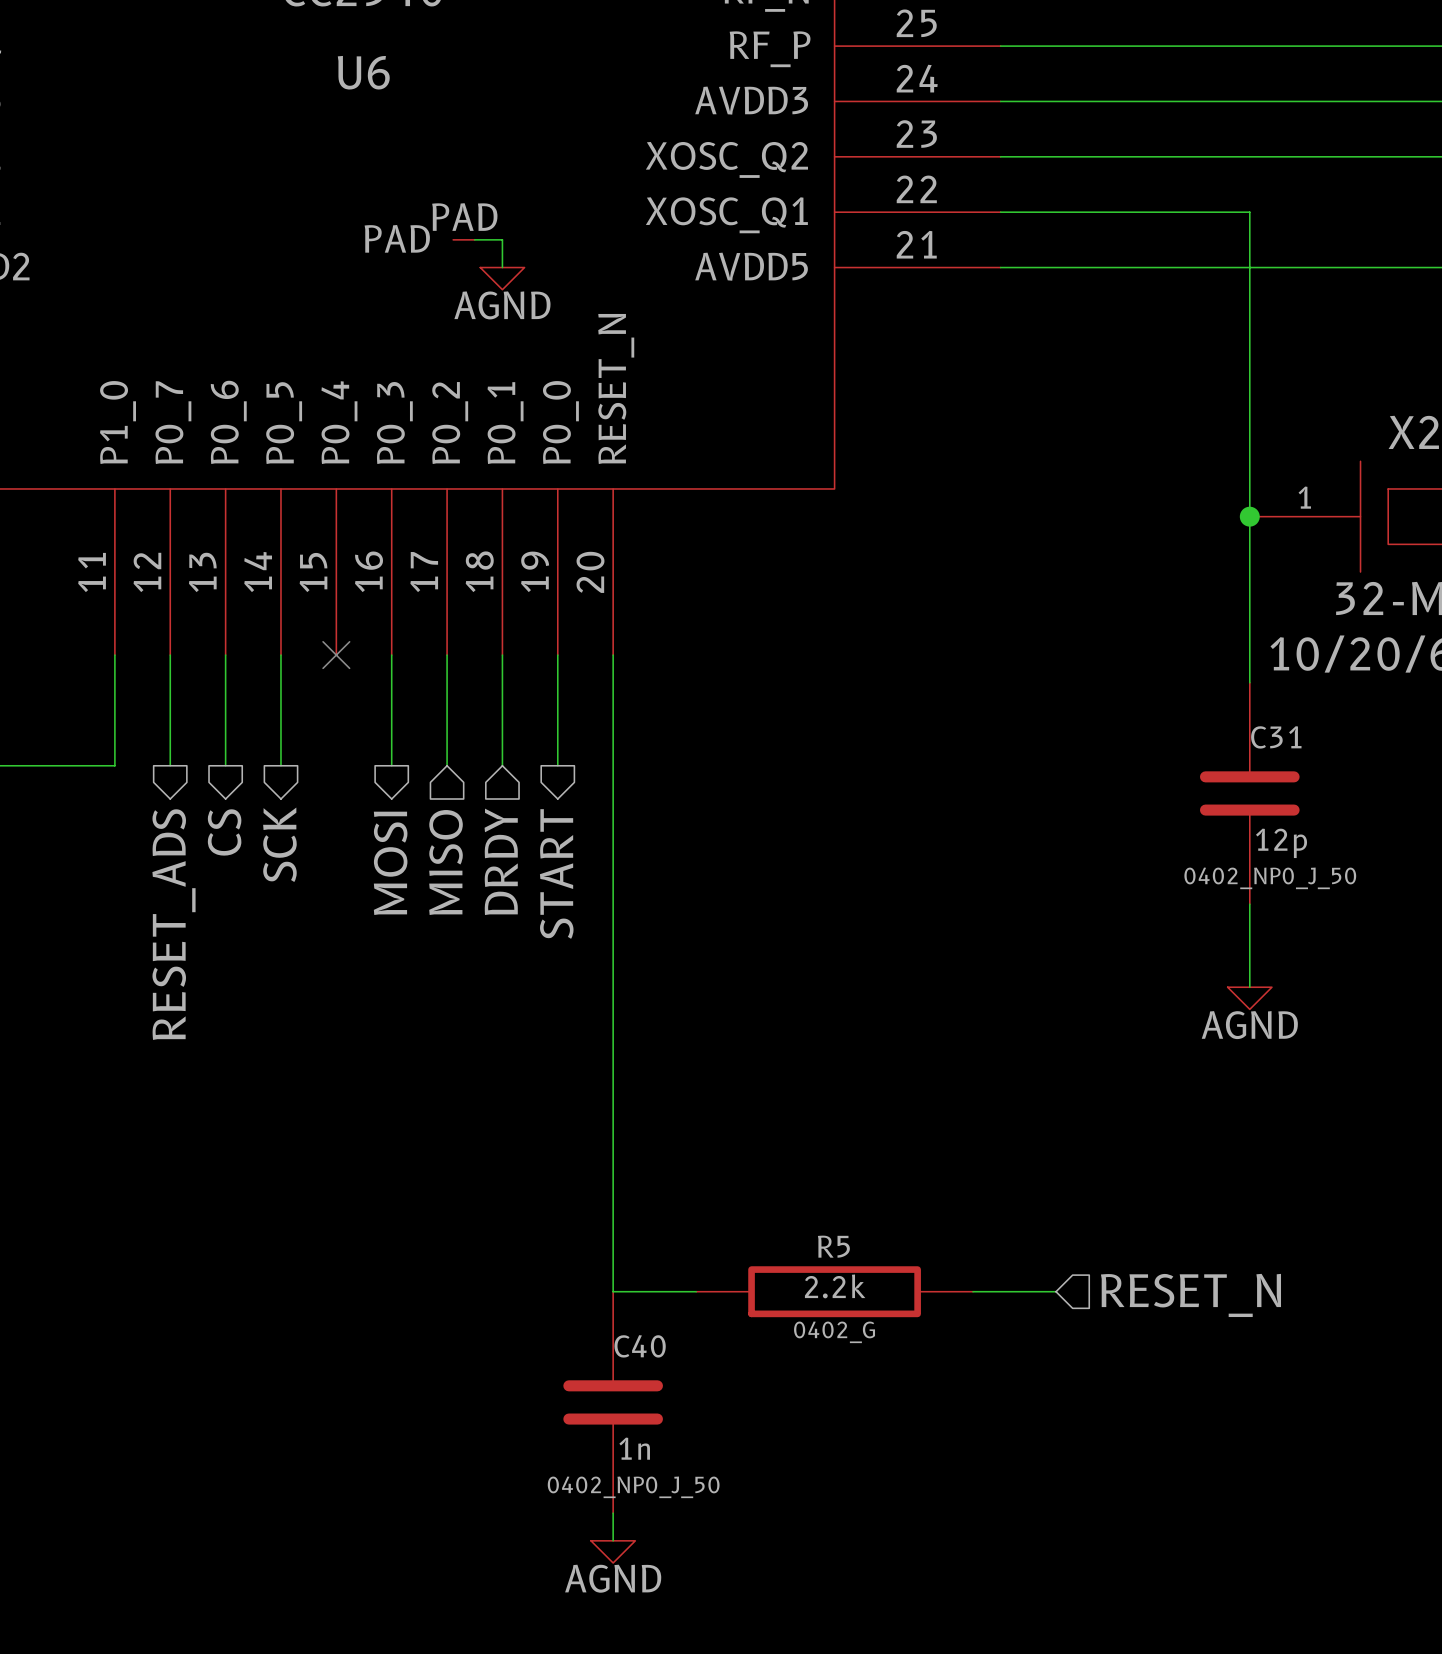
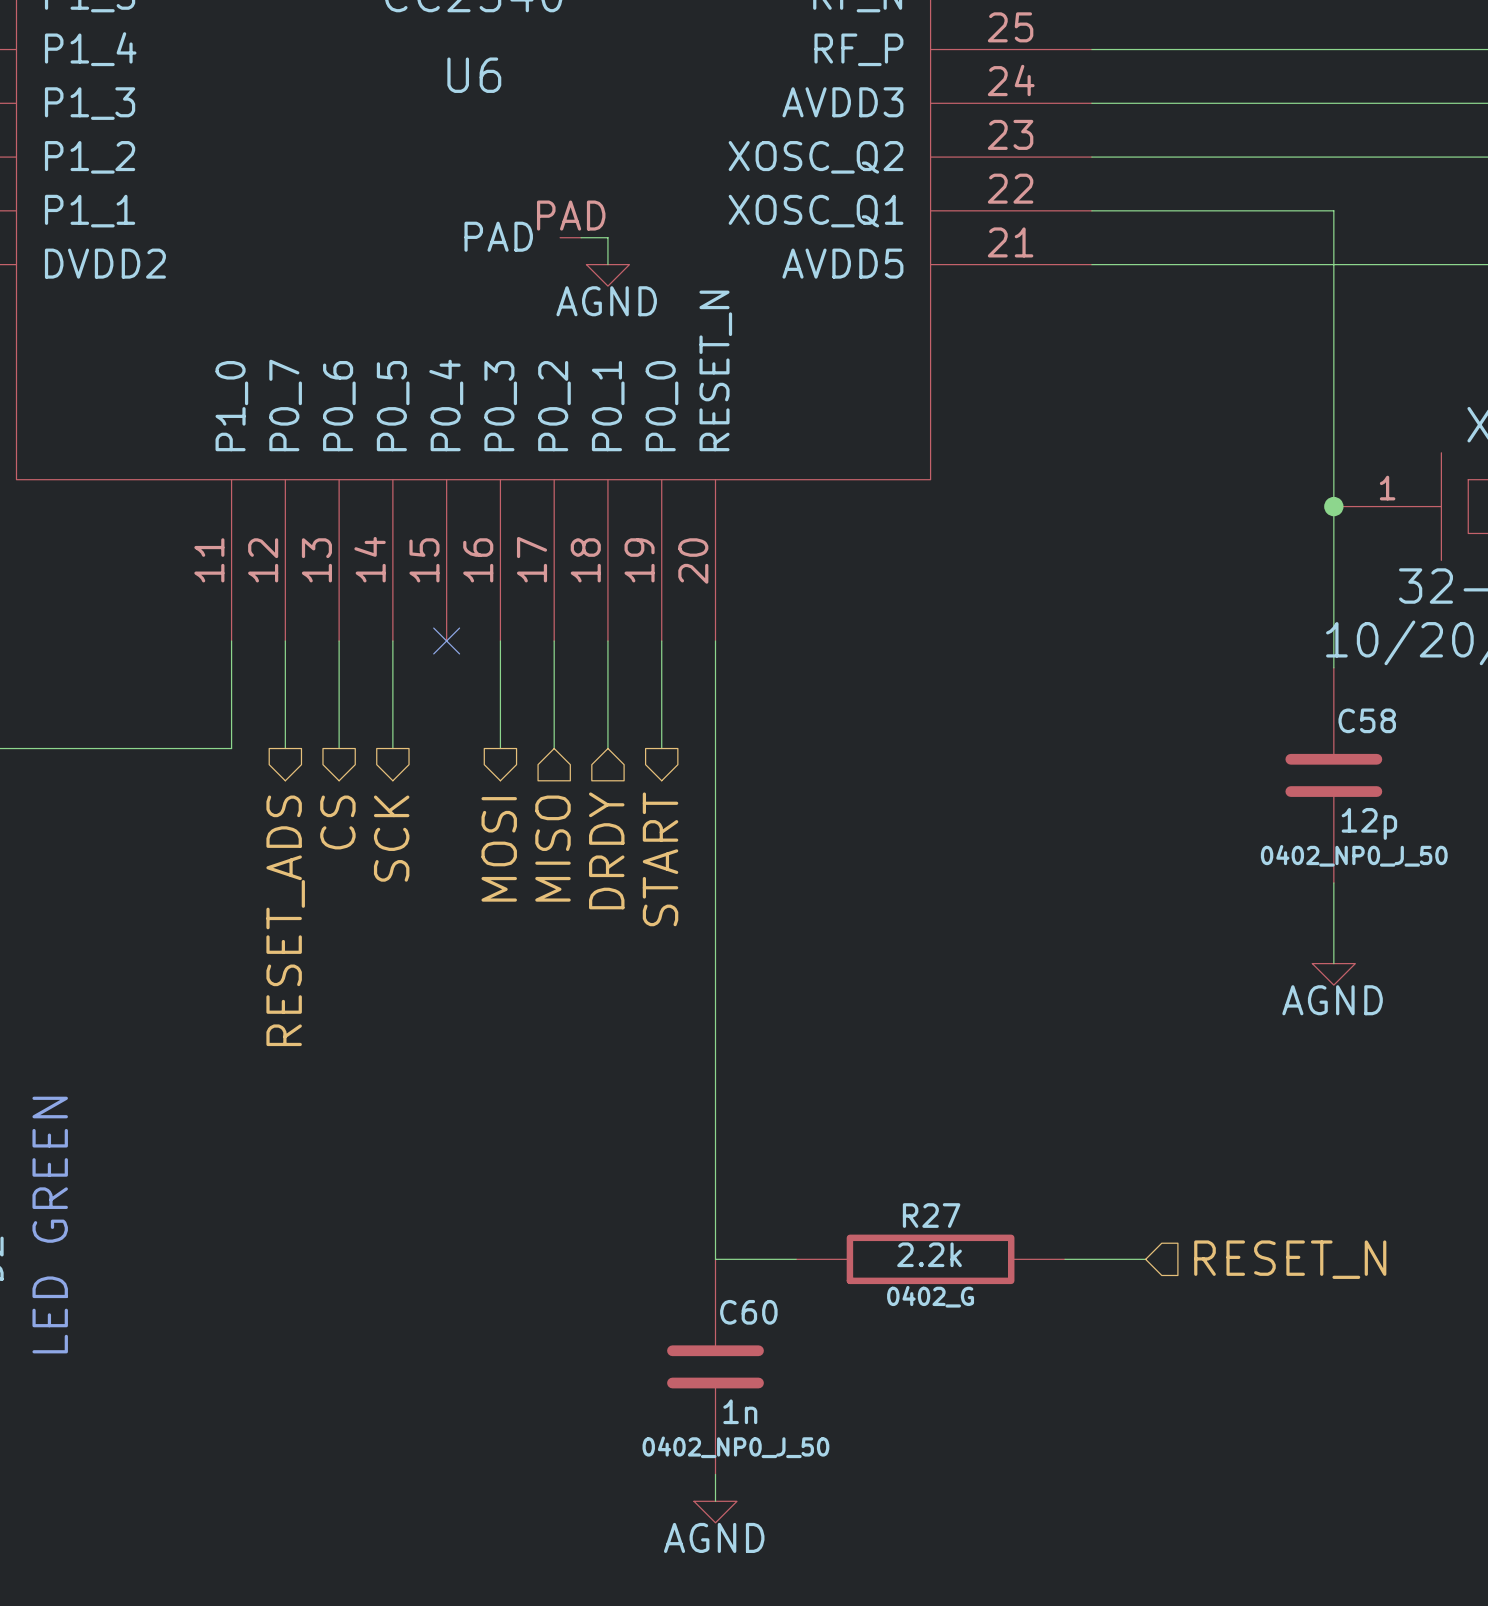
C31 name: C31 (1276, 737) -> C58 (1367, 720)
R5 name: R5 (833, 1246) -> R27 (931, 1215)
C40 name: C40 (640, 1346) -> C60 (748, 1312)

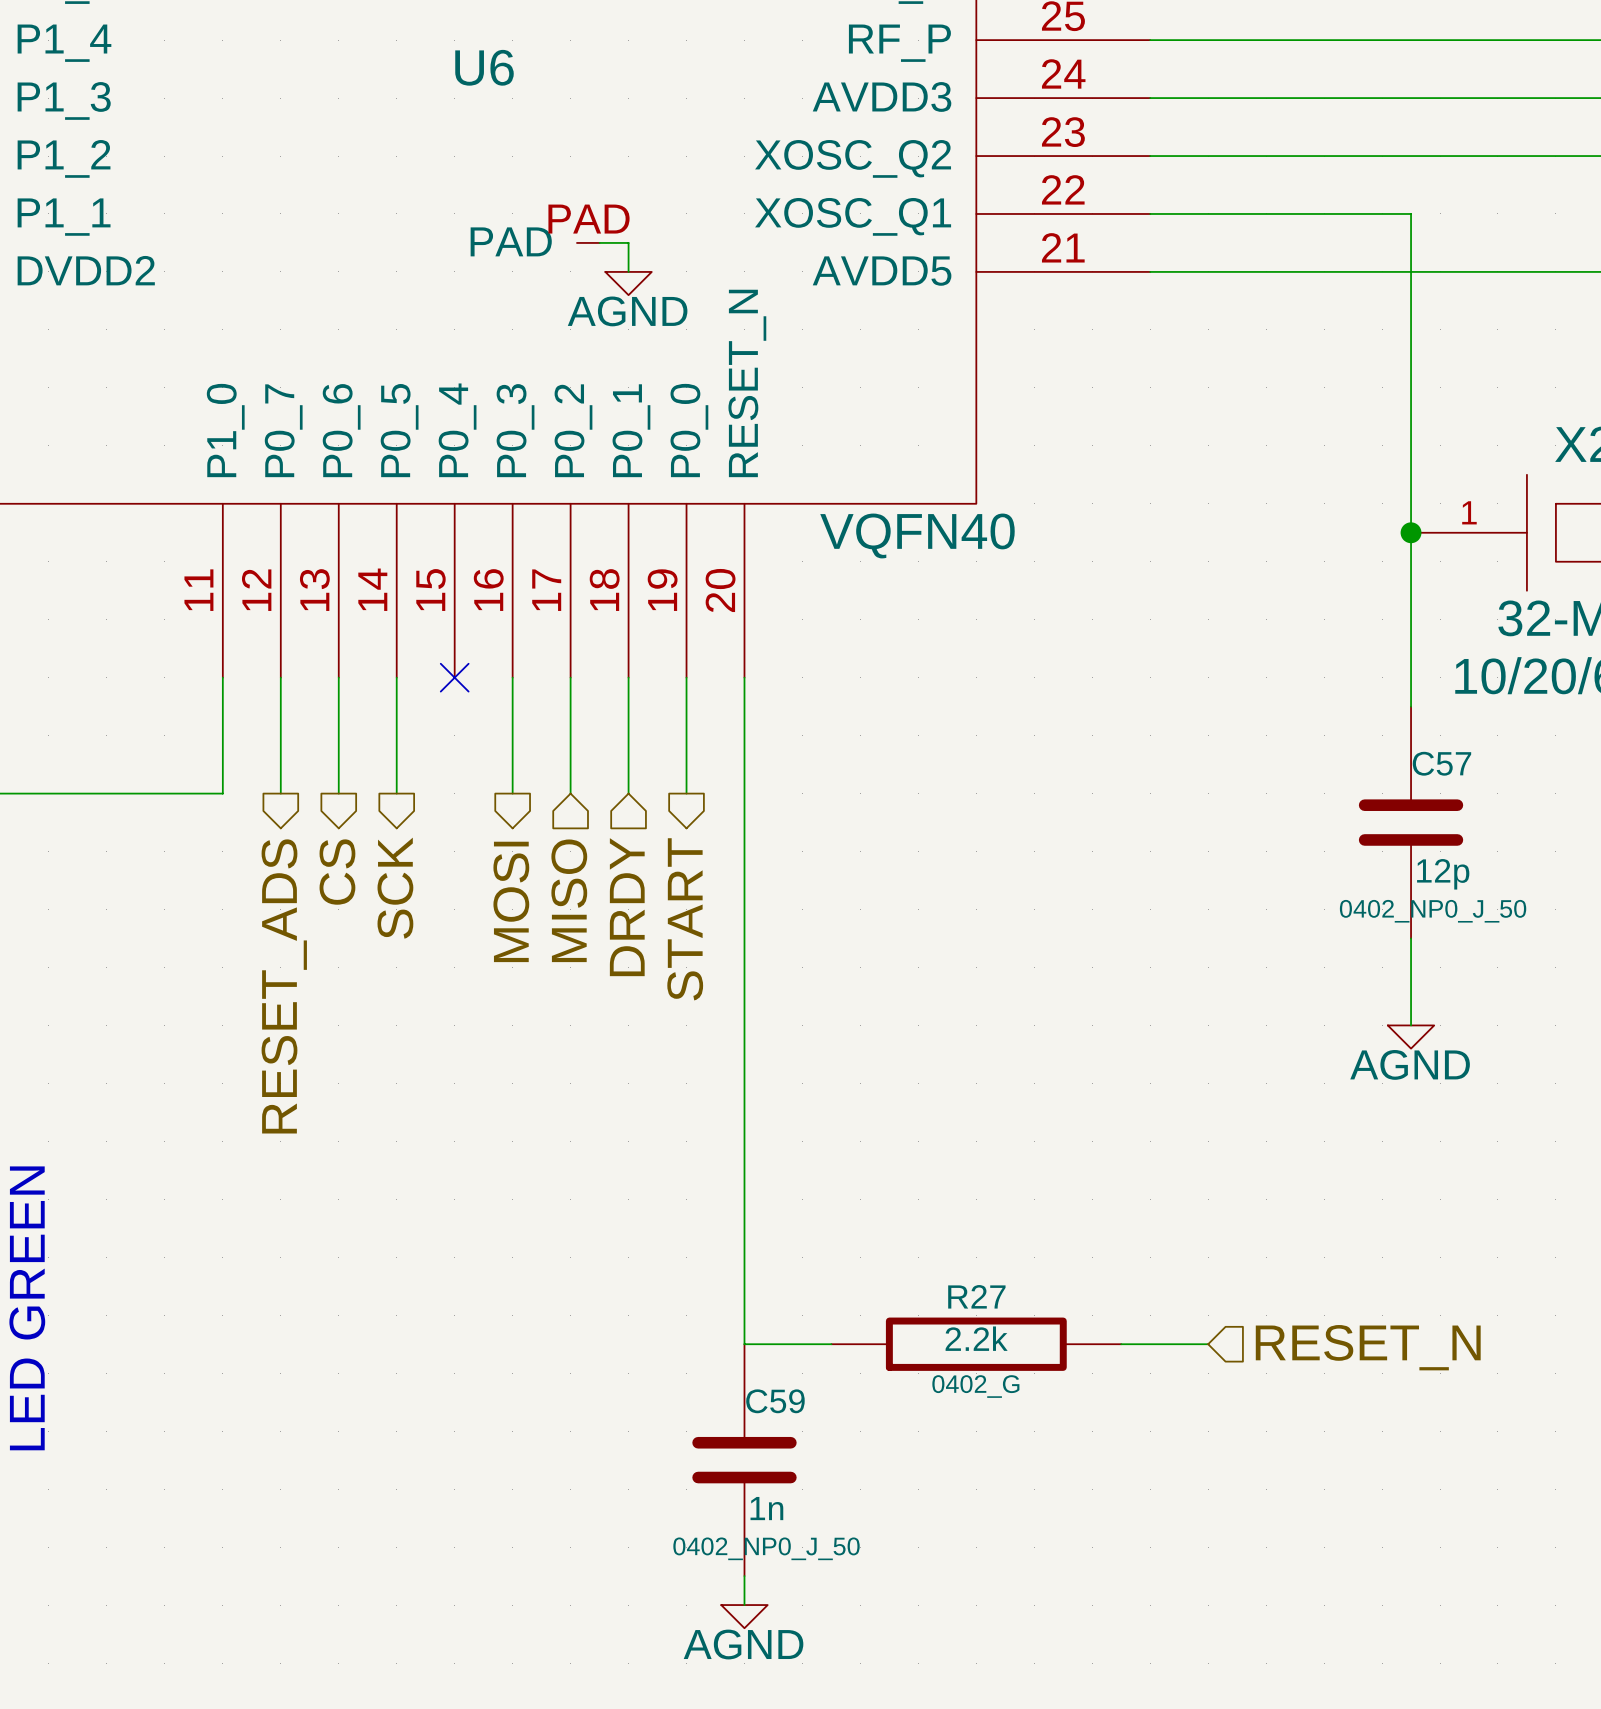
U6 text: none -> VQFN40 (917, 535)
C58 name: C58 (1367, 720) -> C57 (1441, 763)
C60 name: C60 (748, 1312) -> C59 (775, 1401)

